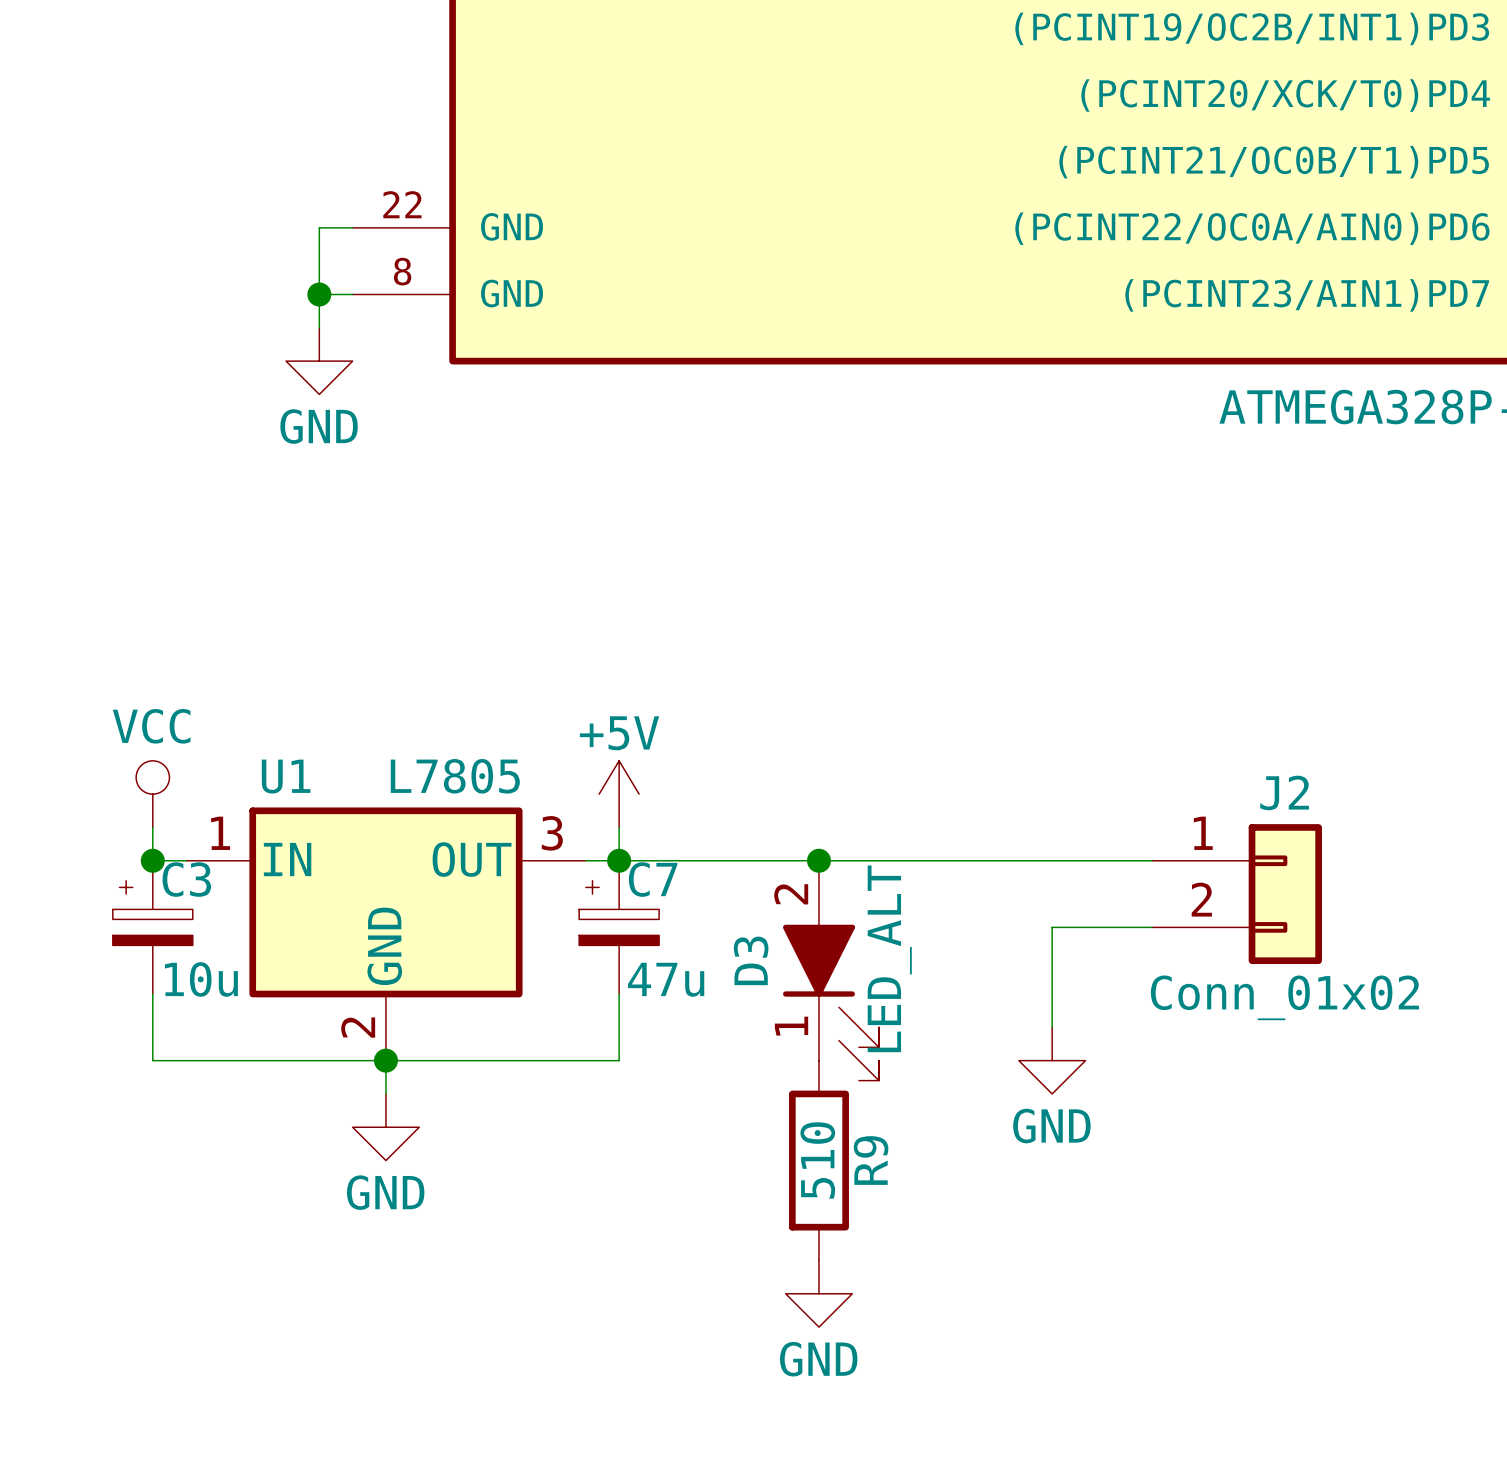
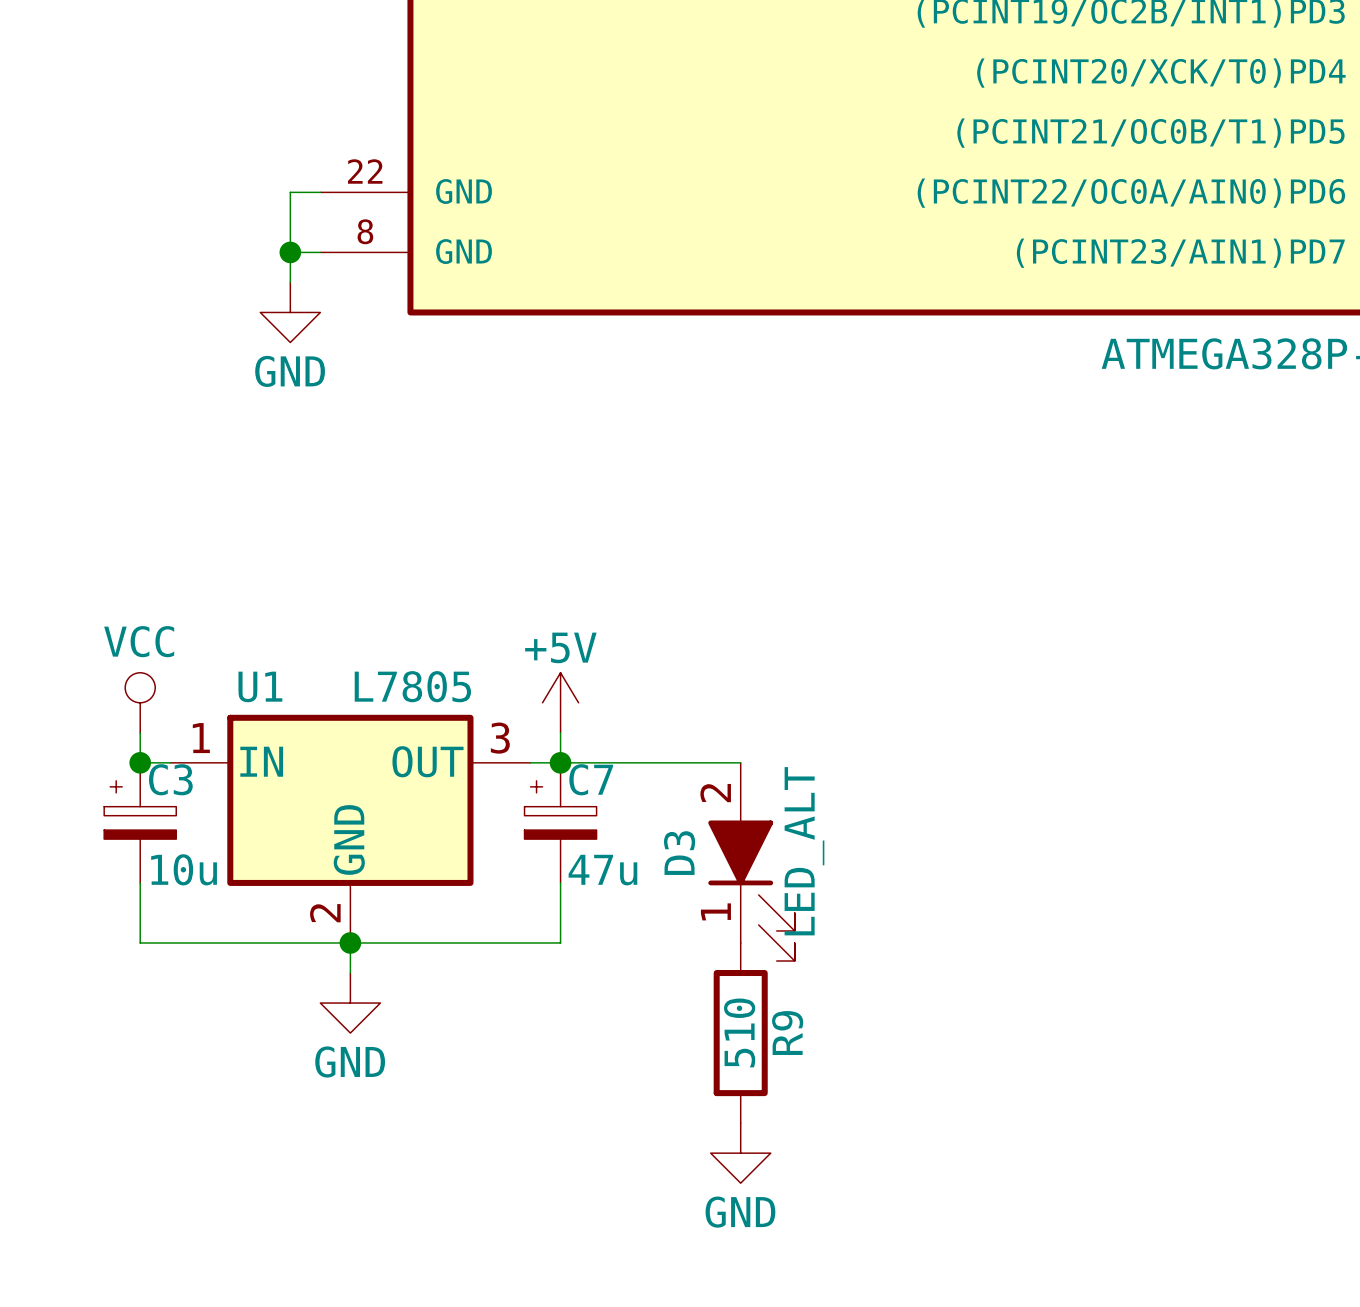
wire: (818, 860) (1152, 860) -> none
junction: (818, 860) -> none
J2: Conn_01x02 (1237, 894) -> none
wire: (1152, 927) (1052, 927) (1052, 1027) -> none
power symbol: GND (1052, 1060) -> none

